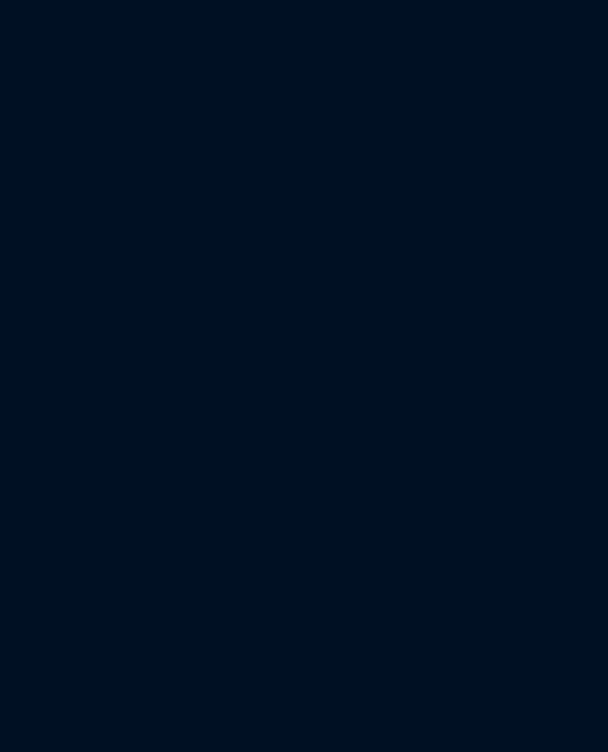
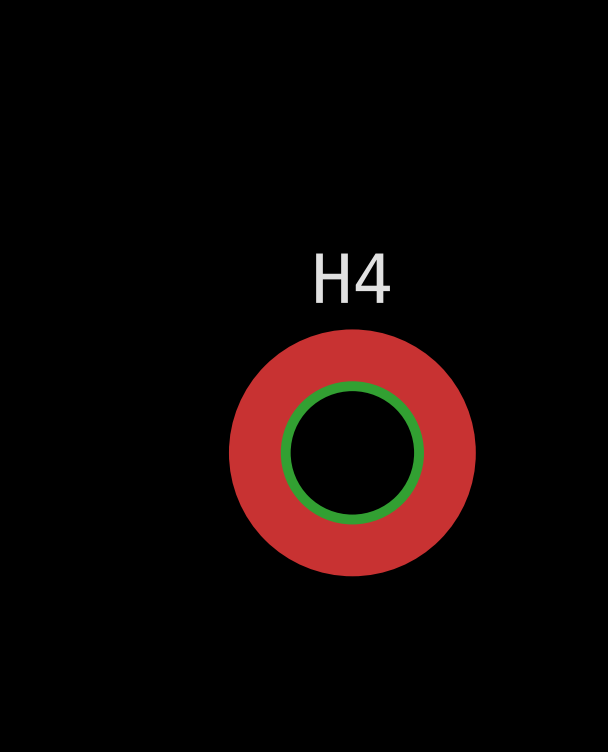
H4: none -> (352, 452)

